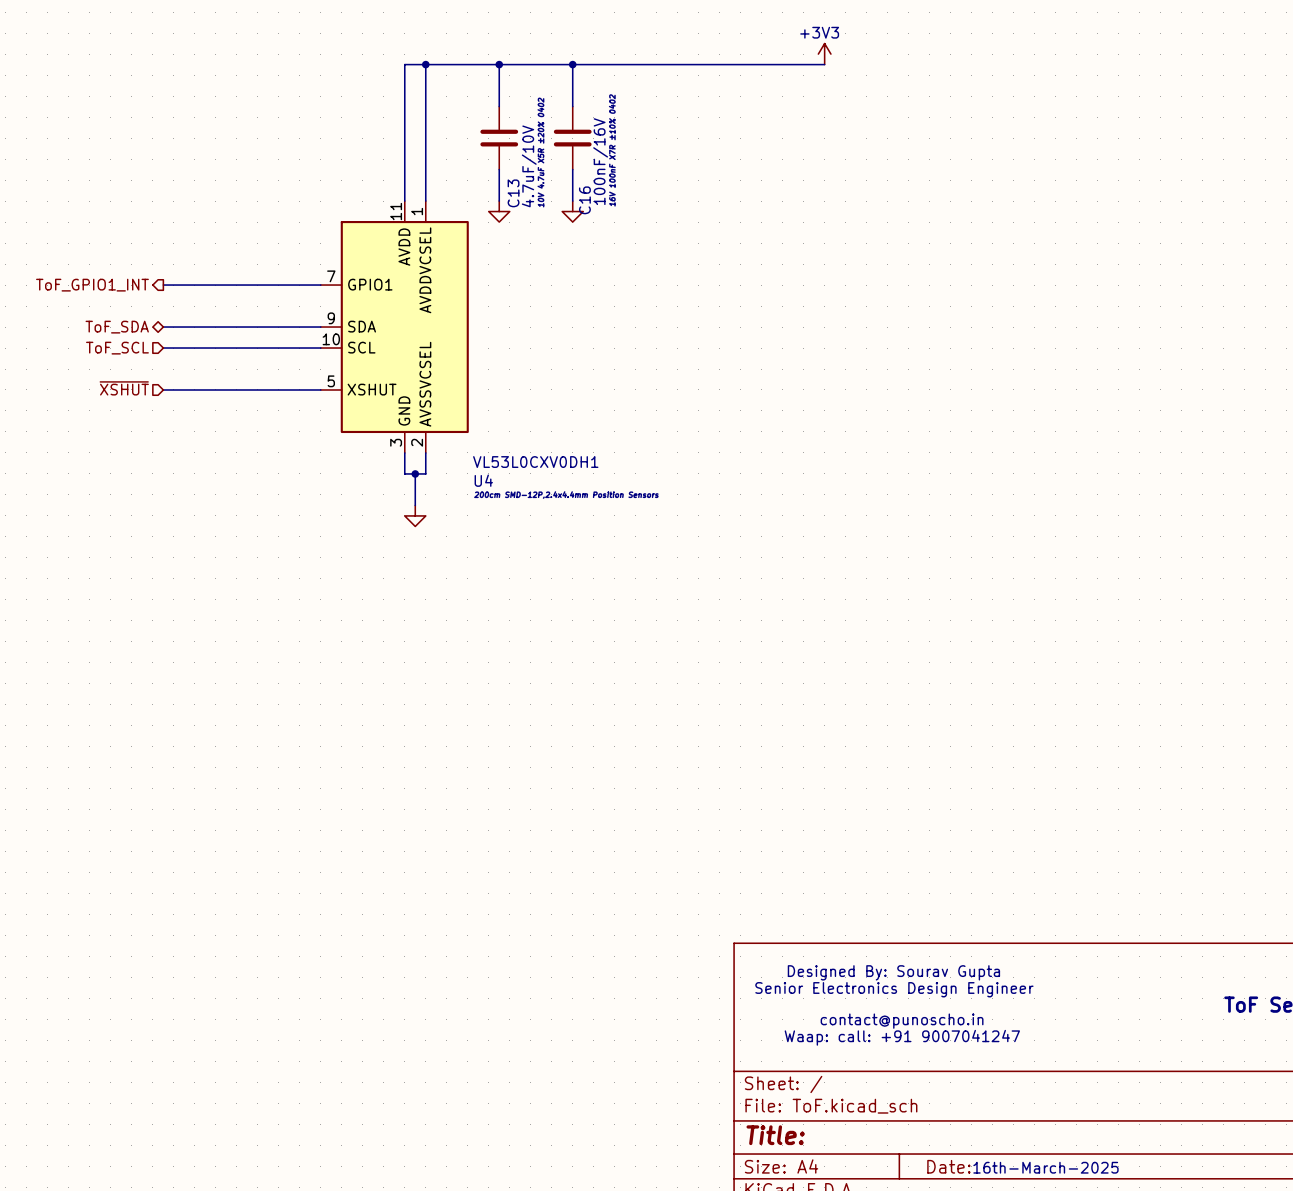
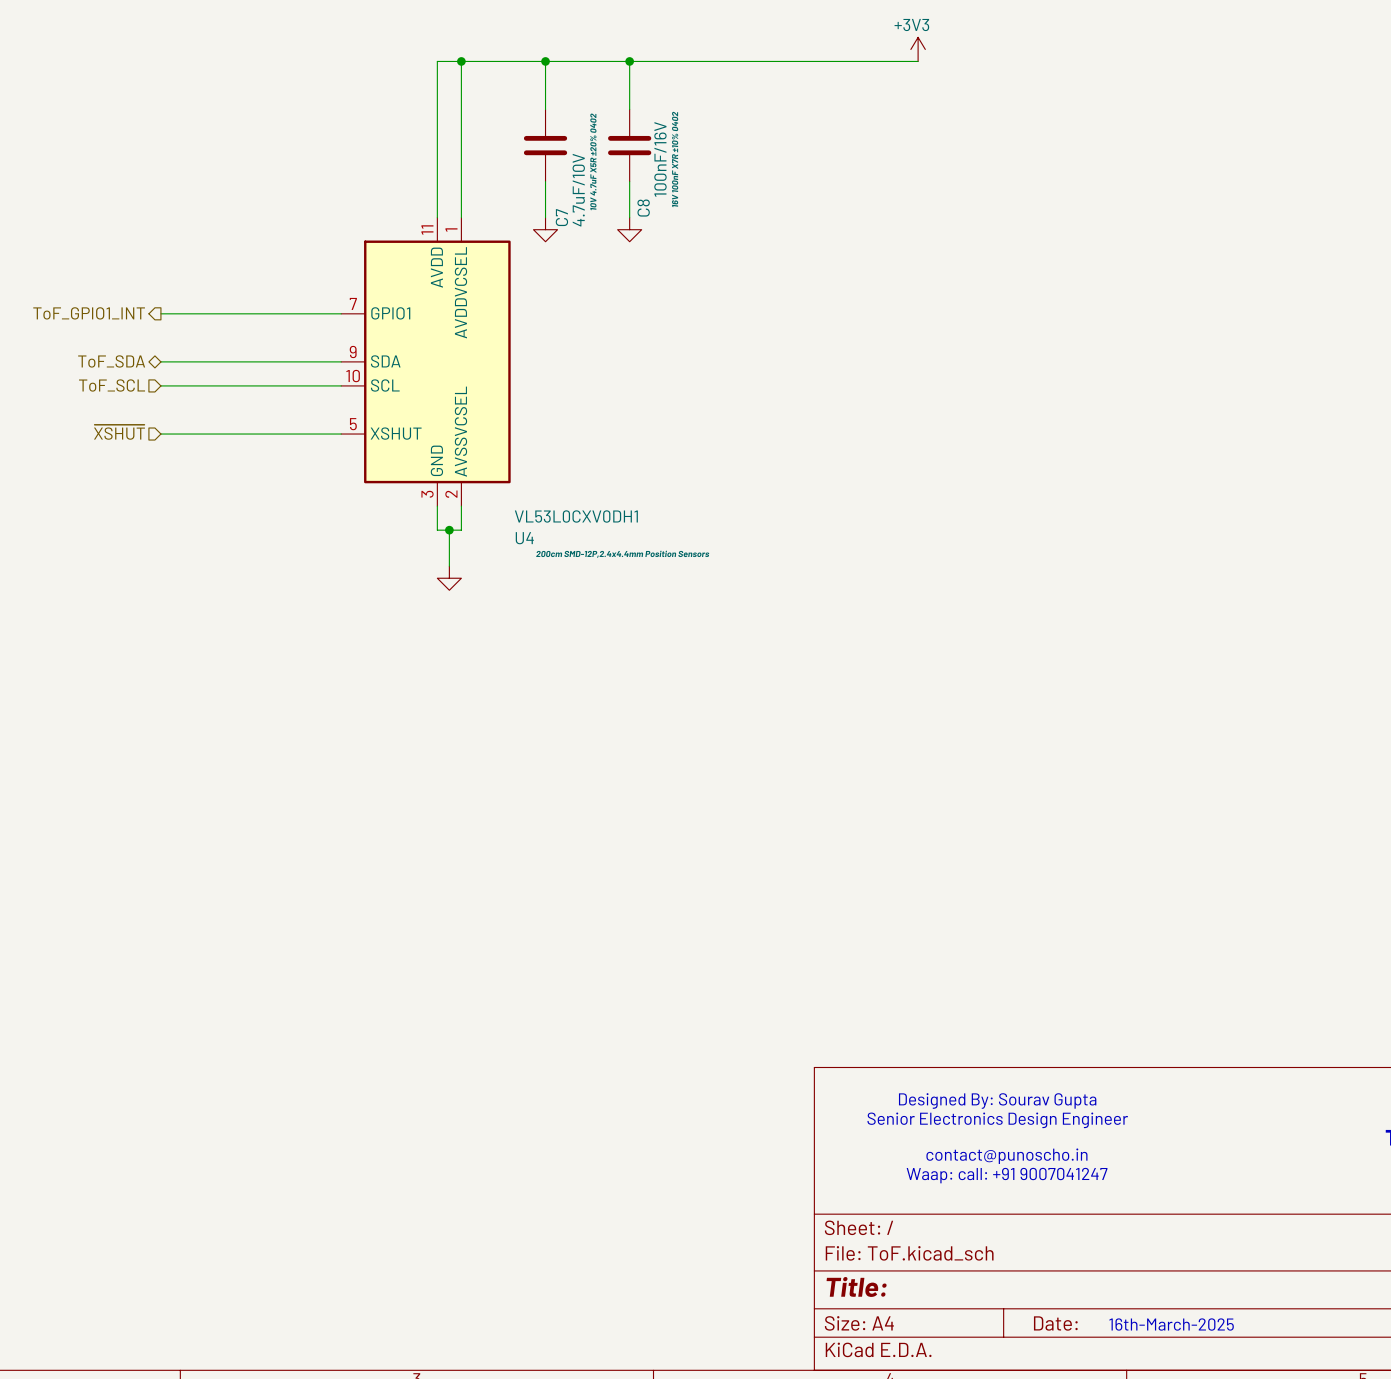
C13 name: C13 (513, 193) -> C7 (561, 217)
C16 name: C16 (584, 200) -> C8 (643, 208)

